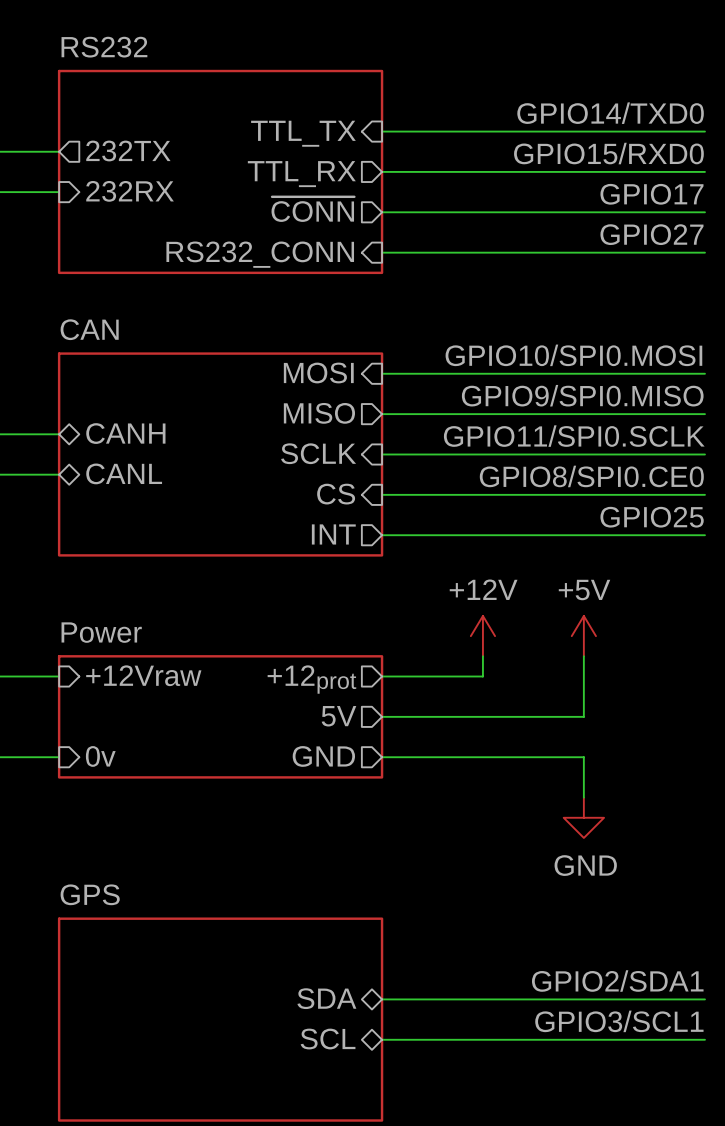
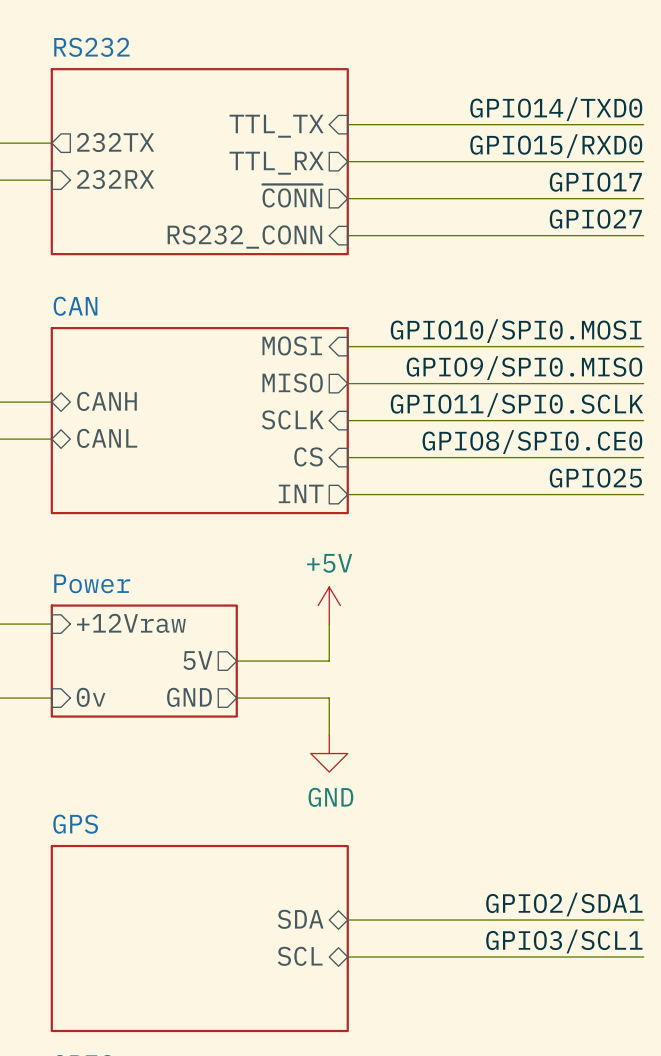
power symbol: +12V (482, 636) -> none
power symbol position: +5V (583, 636) -> +5V (329, 605)
wire: (482, 656) (482, 676) (382, 676) -> none
wire: (583, 656) (583, 716) (382, 716) -> none
wire: none -> (329, 624) (329, 661) (236, 661)
sheet pin: +12prot (311, 679) -> none
sheet Power: none -> (144, 661)
sheet Power: (220, 716) -> none
sheet pin position: 5V (338, 716) -> 5V (197, 660)
sheet pin position: GND (323, 756) -> GND (189, 697)
wire: none -> (236, 698) (329, 698) (329, 735)
wire: (382, 757) (583, 757) (583, 797) -> none
power symbol position: GND (583, 817) -> GND (329, 753)

